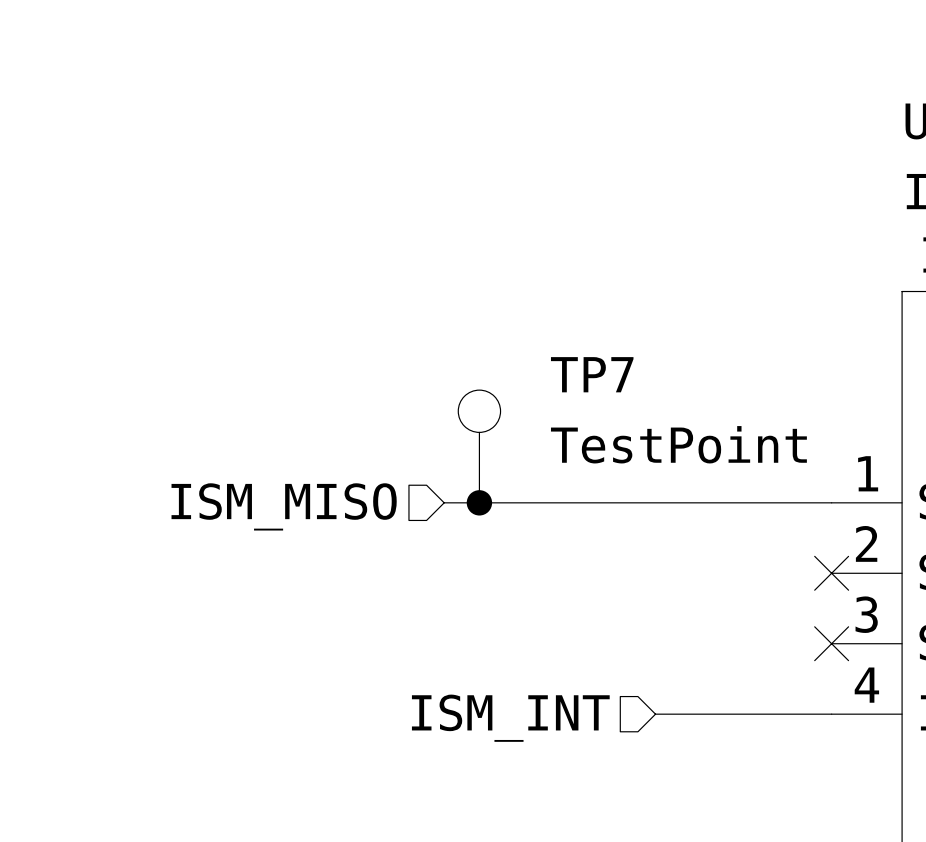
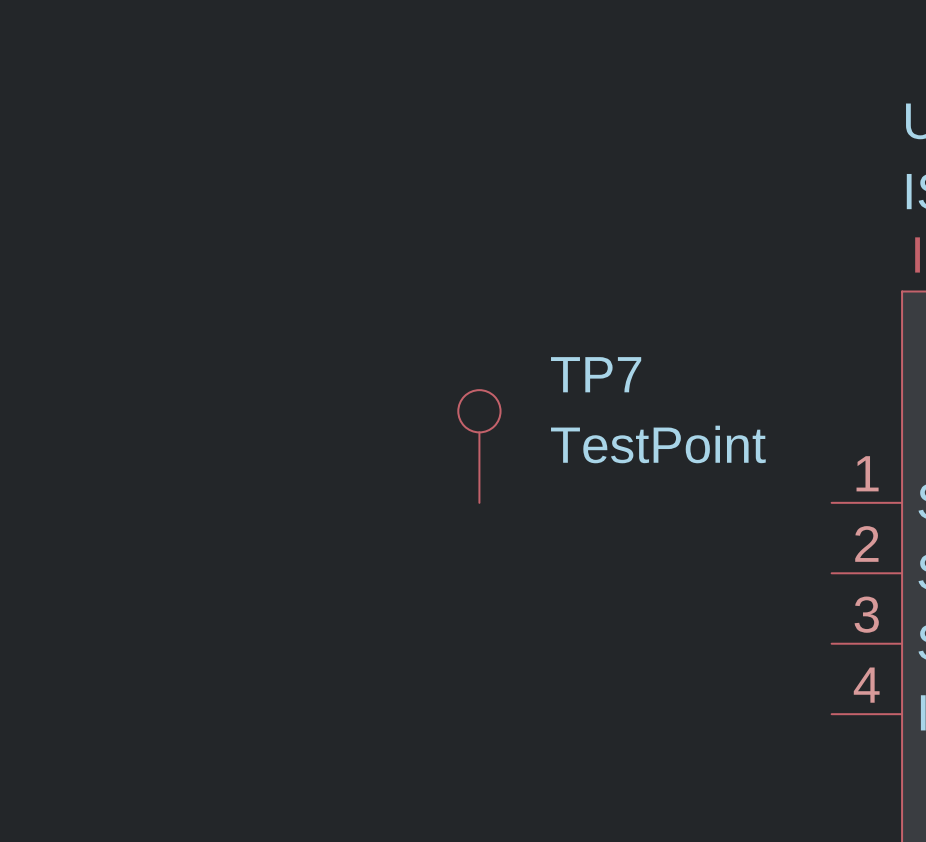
wire: (444, 502) (831, 502) -> none
junction: (479, 502) -> none
hierarchical label: ISM_MISO (284, 506) -> none
no-connect mark: (831, 573) -> none
no-connect mark: (831, 643) -> none
wire: (655, 714) (831, 714) -> none
hierarchical label: ISM_INT (510, 718) -> none

